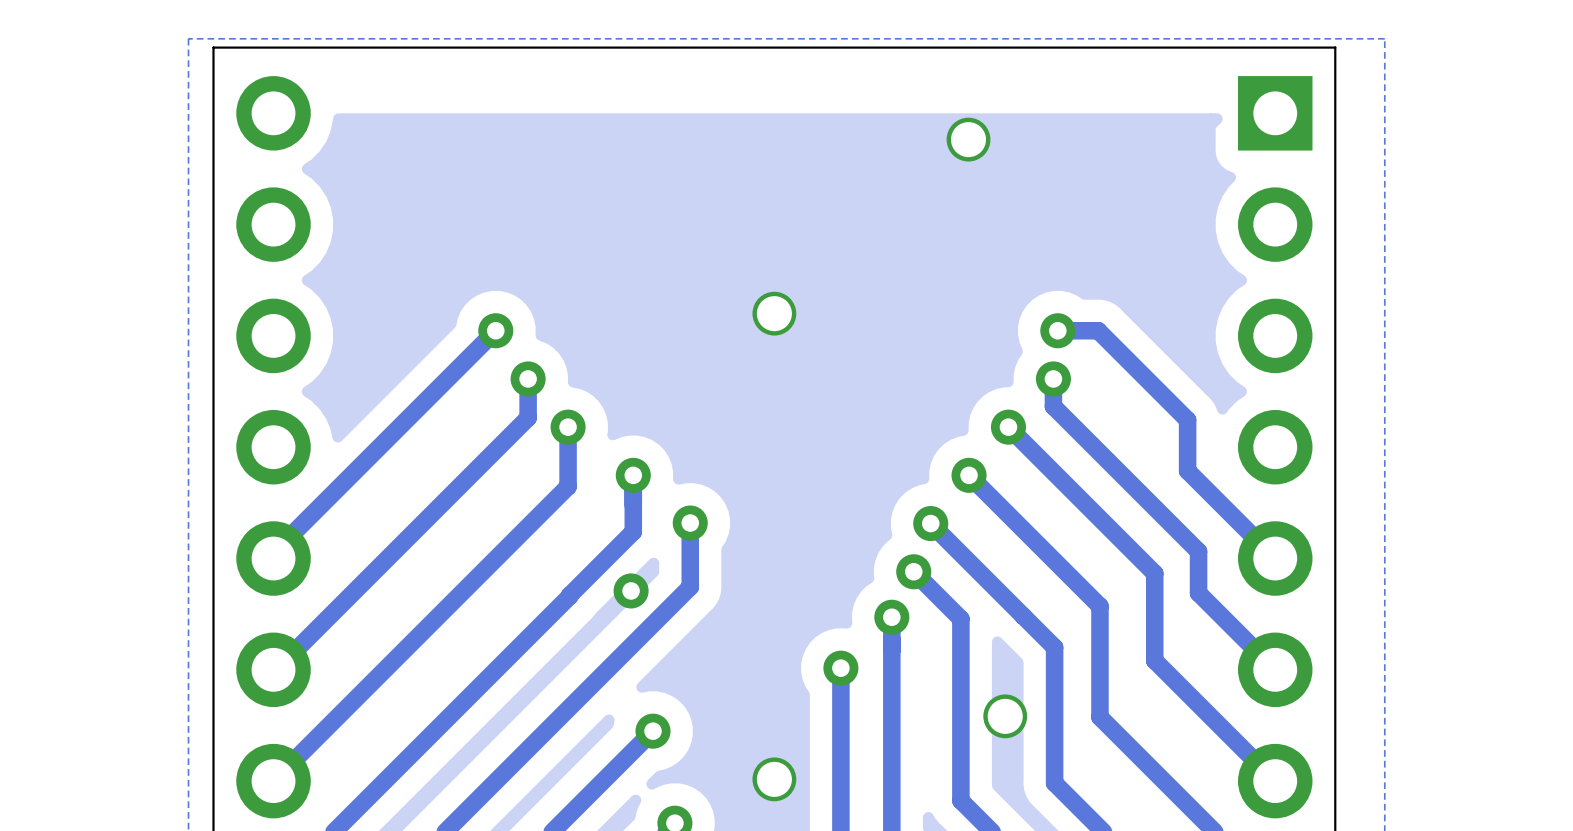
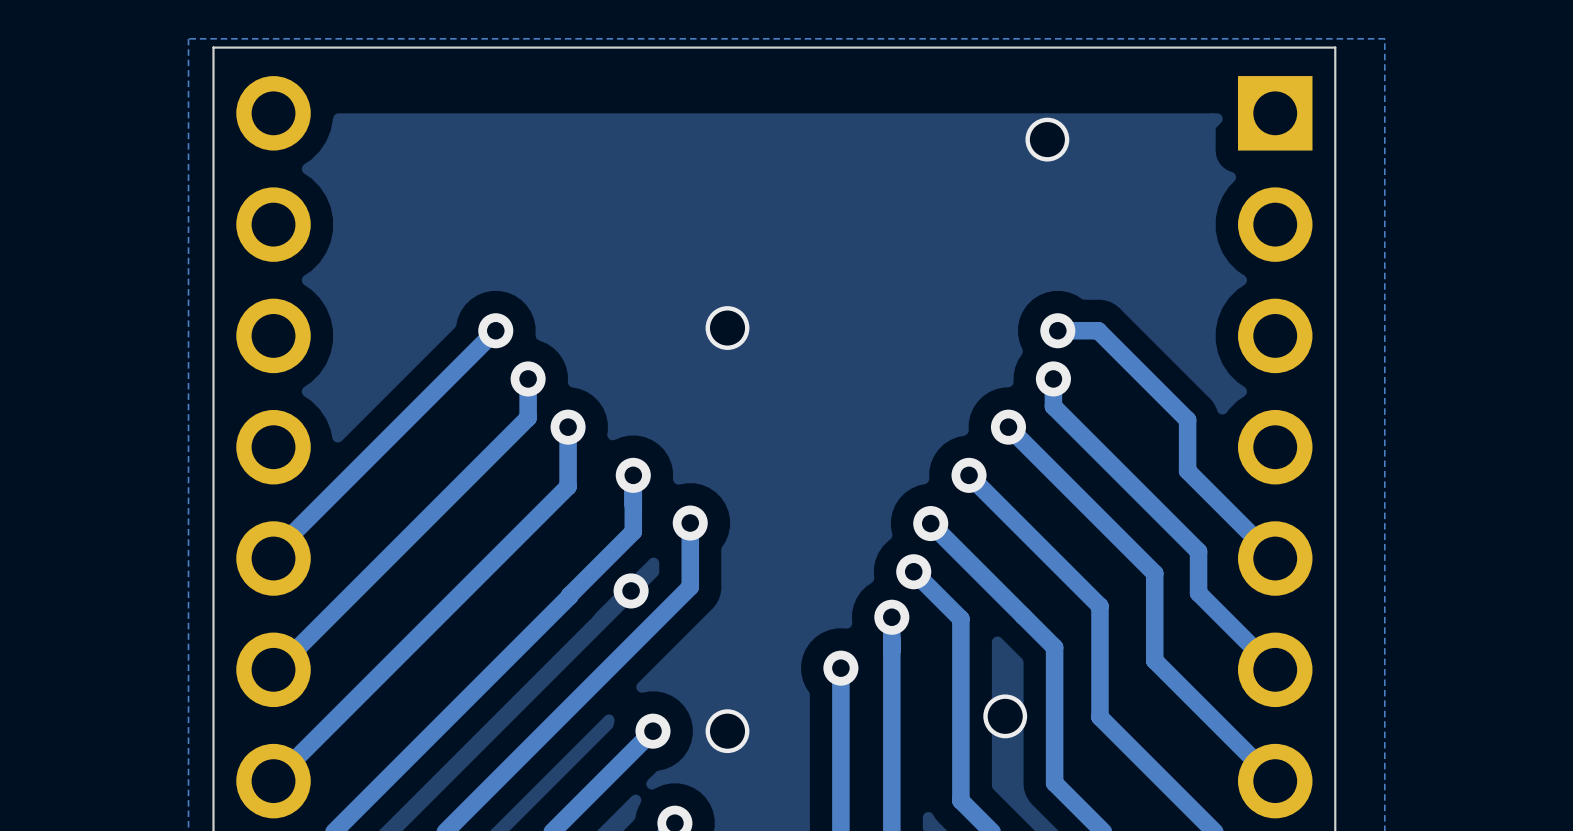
via position: (968, 139) -> (1047, 139)
via position: (774, 313) -> (727, 328)
via position: (774, 779) -> (727, 731)

